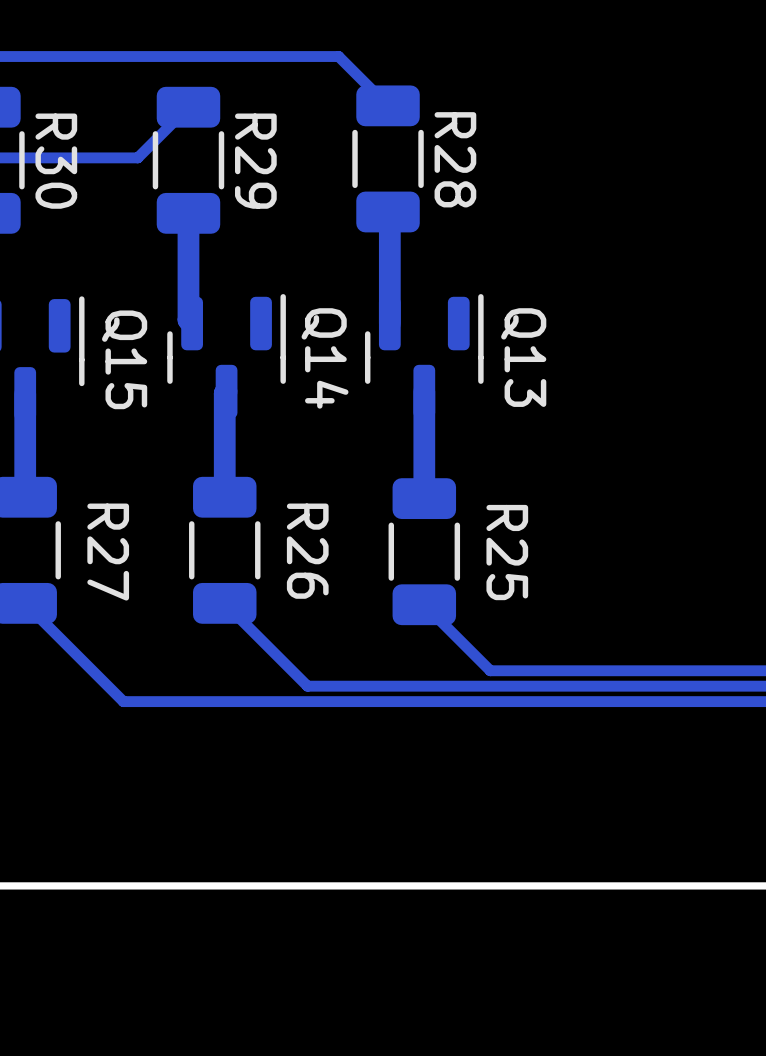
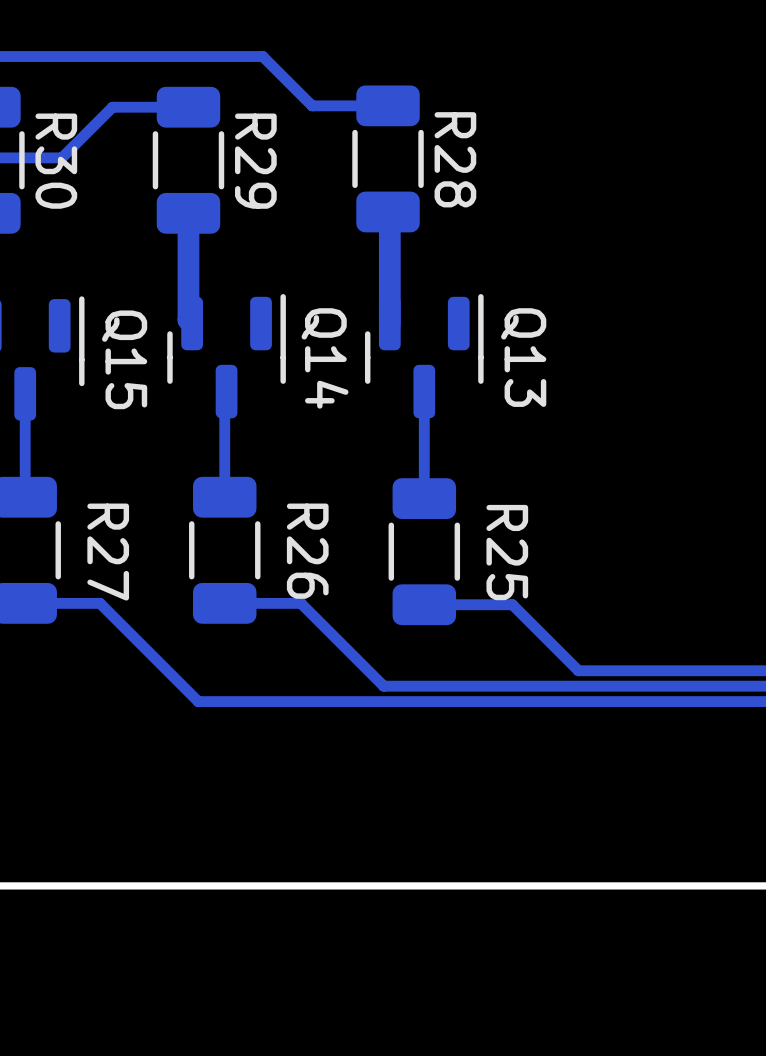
track: (262, 56) (338, 56) (388, 105) -> (262, 56) (312, 105) (388, 105)
track: (188, 107) (137, 157) (61, 157) -> (188, 107) (112, 107) (61, 157)
track width: thick (226, 391) (224, 393) (224, 497) -> thin (226, 391) (224, 393) (224, 497)
track width: thick (424, 391) (424, 498) -> thin (424, 391) (424, 498)
track width: thick (25, 393) (25, 497) -> thin (25, 393) (25, 497)
track: (25, 603) (123, 701) (198, 701) -> (25, 603) (100, 603) (198, 701)
track: (224, 603) (307, 686) (383, 686) -> (224, 603) (300, 603) (383, 686)
track: (424, 604) (490, 670) (578, 670) -> (424, 604) (512, 604) (578, 670)

